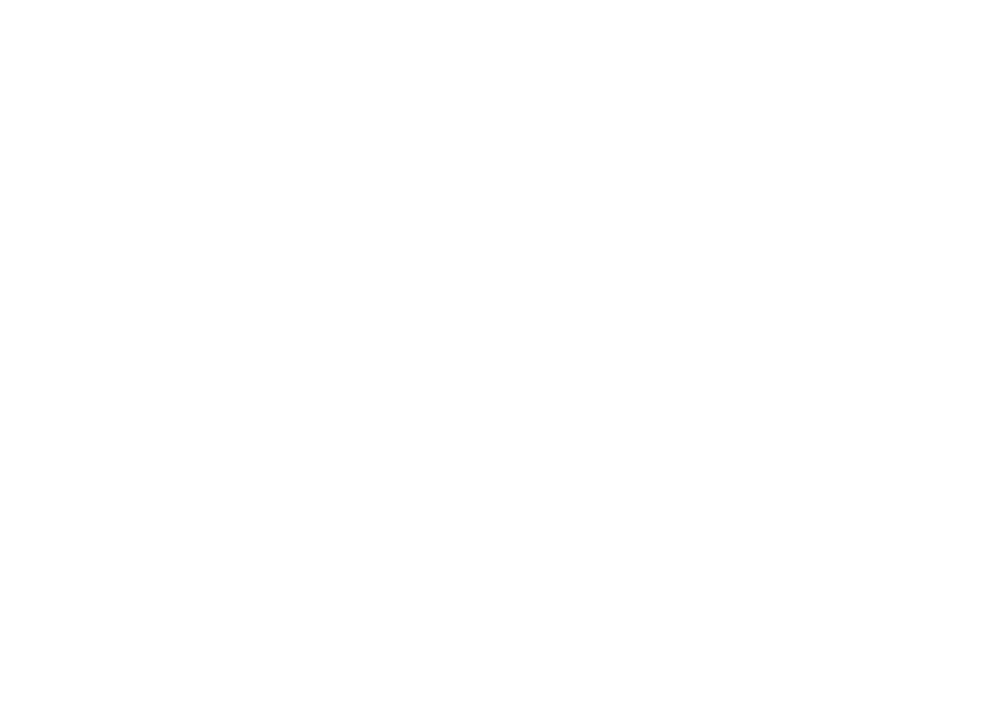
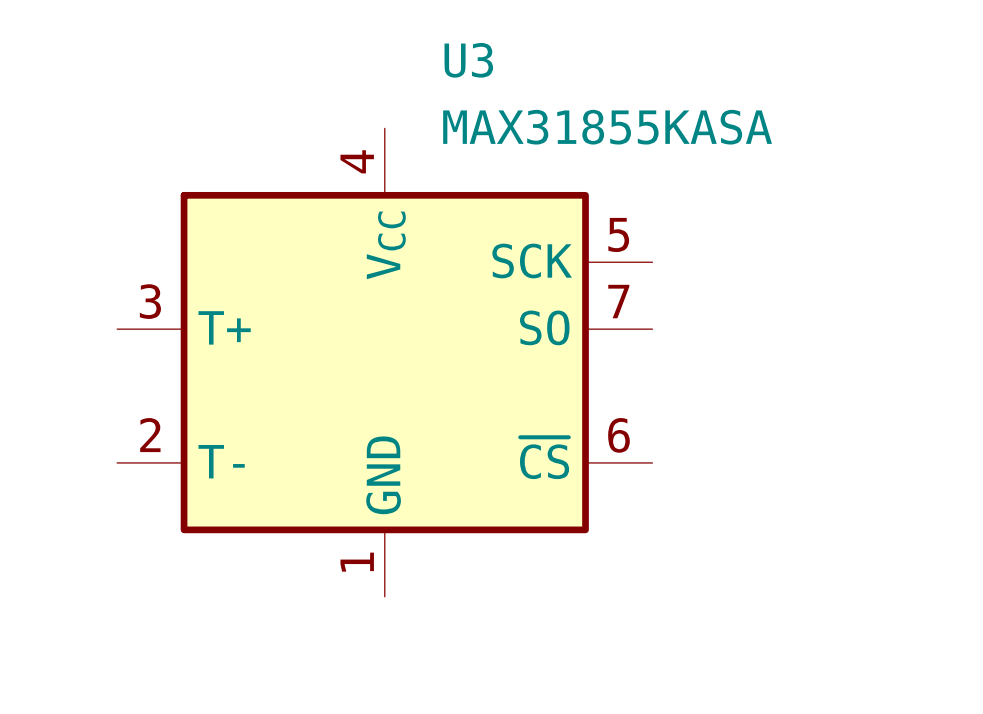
U3: none -> MAX31855KASA (384, 362)

